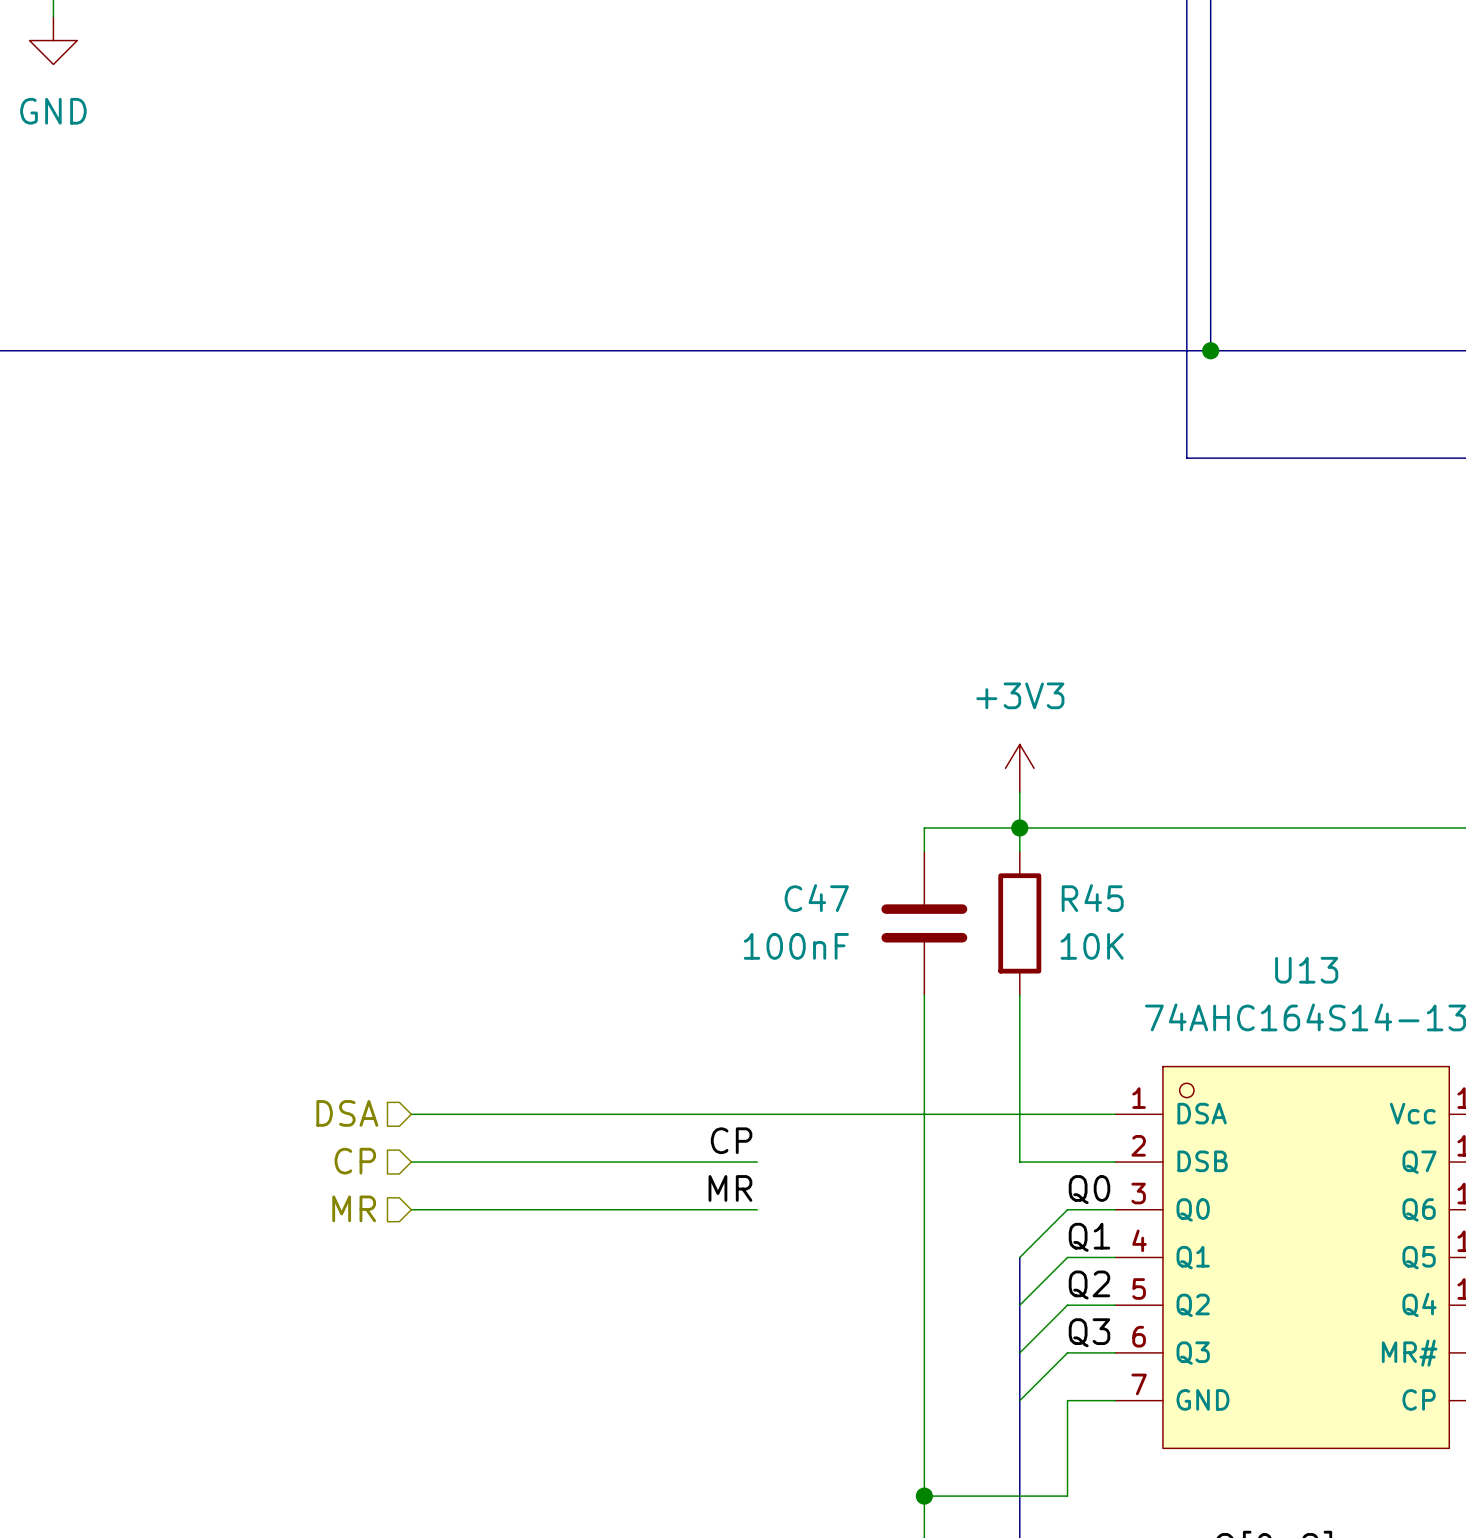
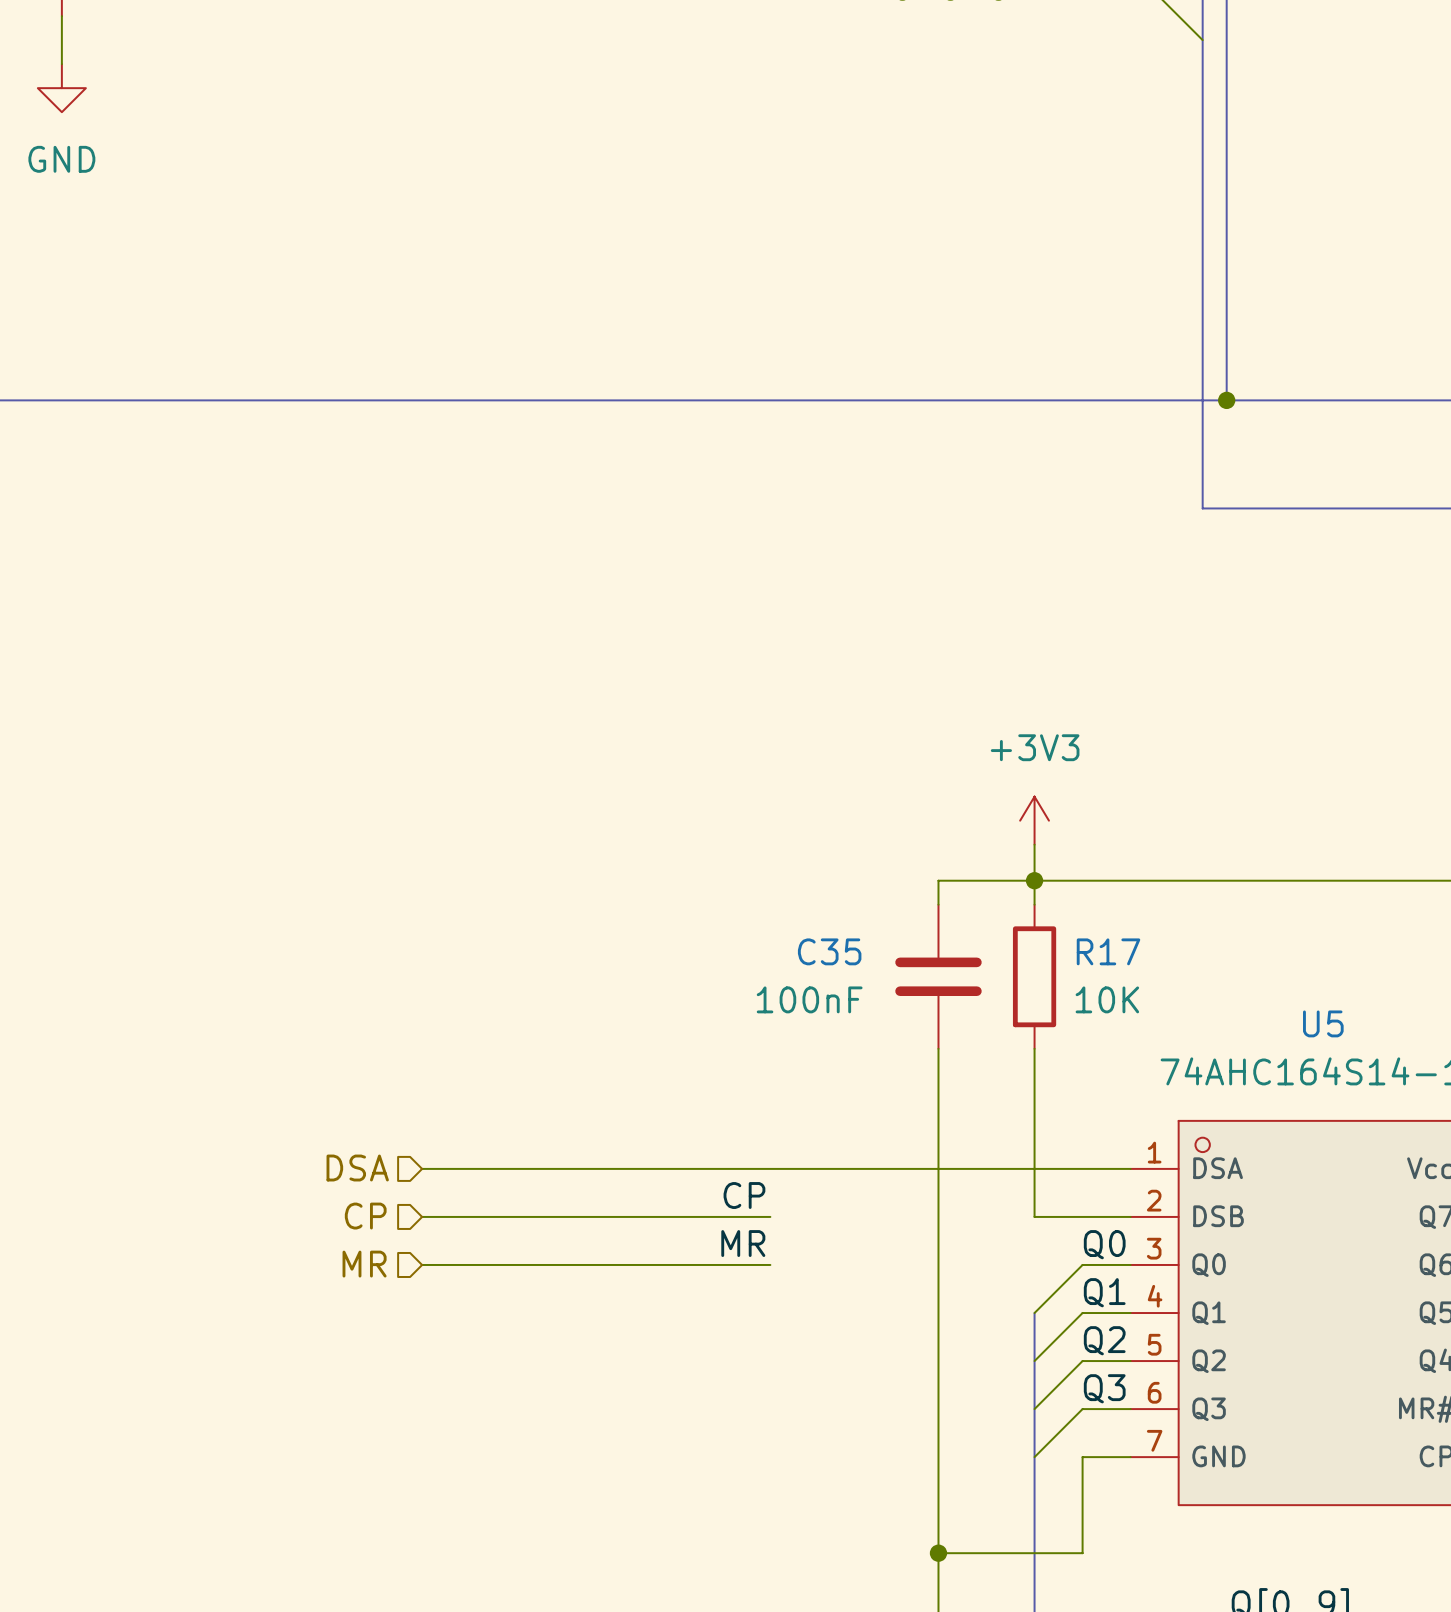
C47 name: C47 (816, 898) -> C35 (829, 951)
R45 name: R45 (1092, 898) -> R17 (1108, 951)
U13 name: U13 (1306, 970) -> U5 (1323, 1023)

